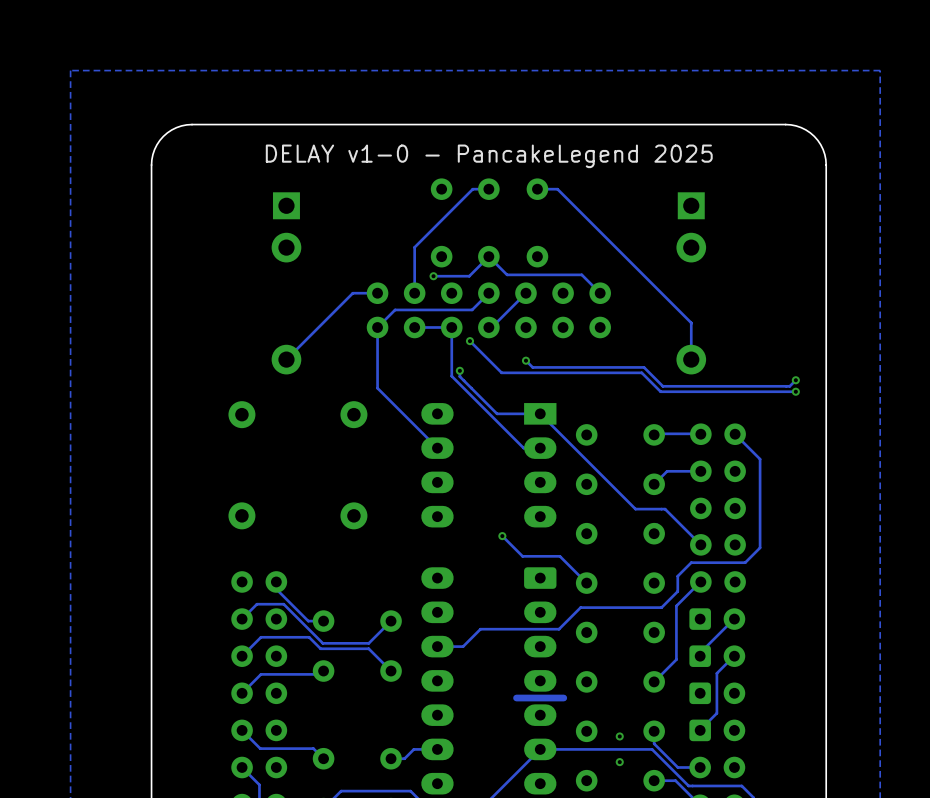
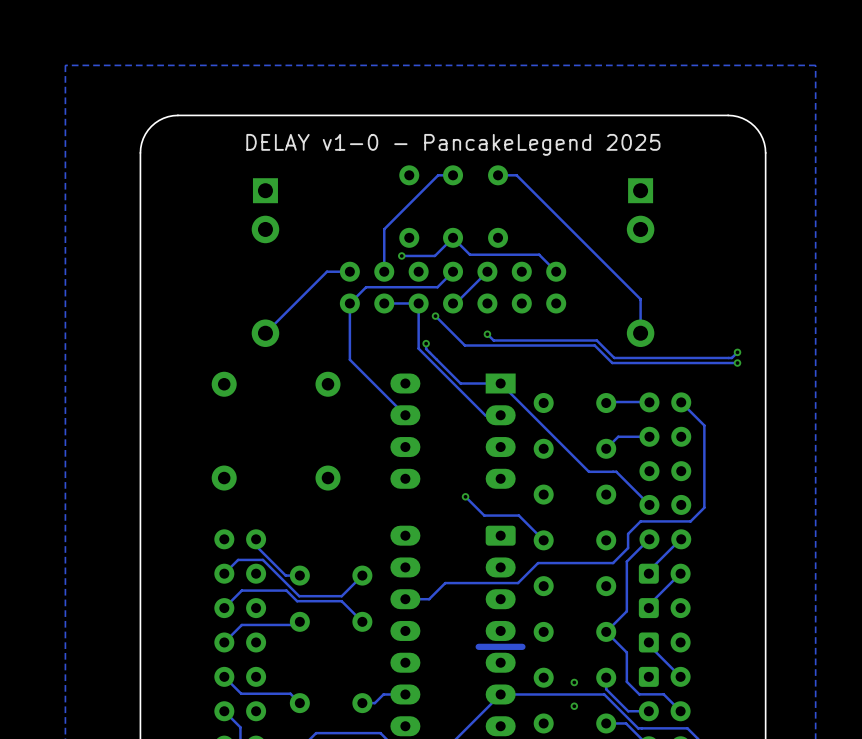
track: none -> (680, 539) (648, 571) (648, 573)
track: (734, 655) (716, 673) (716, 713) (700, 729) -> none
track: none -> (606, 631) (626, 652) (626, 681) (639, 694) (663, 694) (680, 711)
track: none -> (648, 642) (648, 645) (680, 676)

